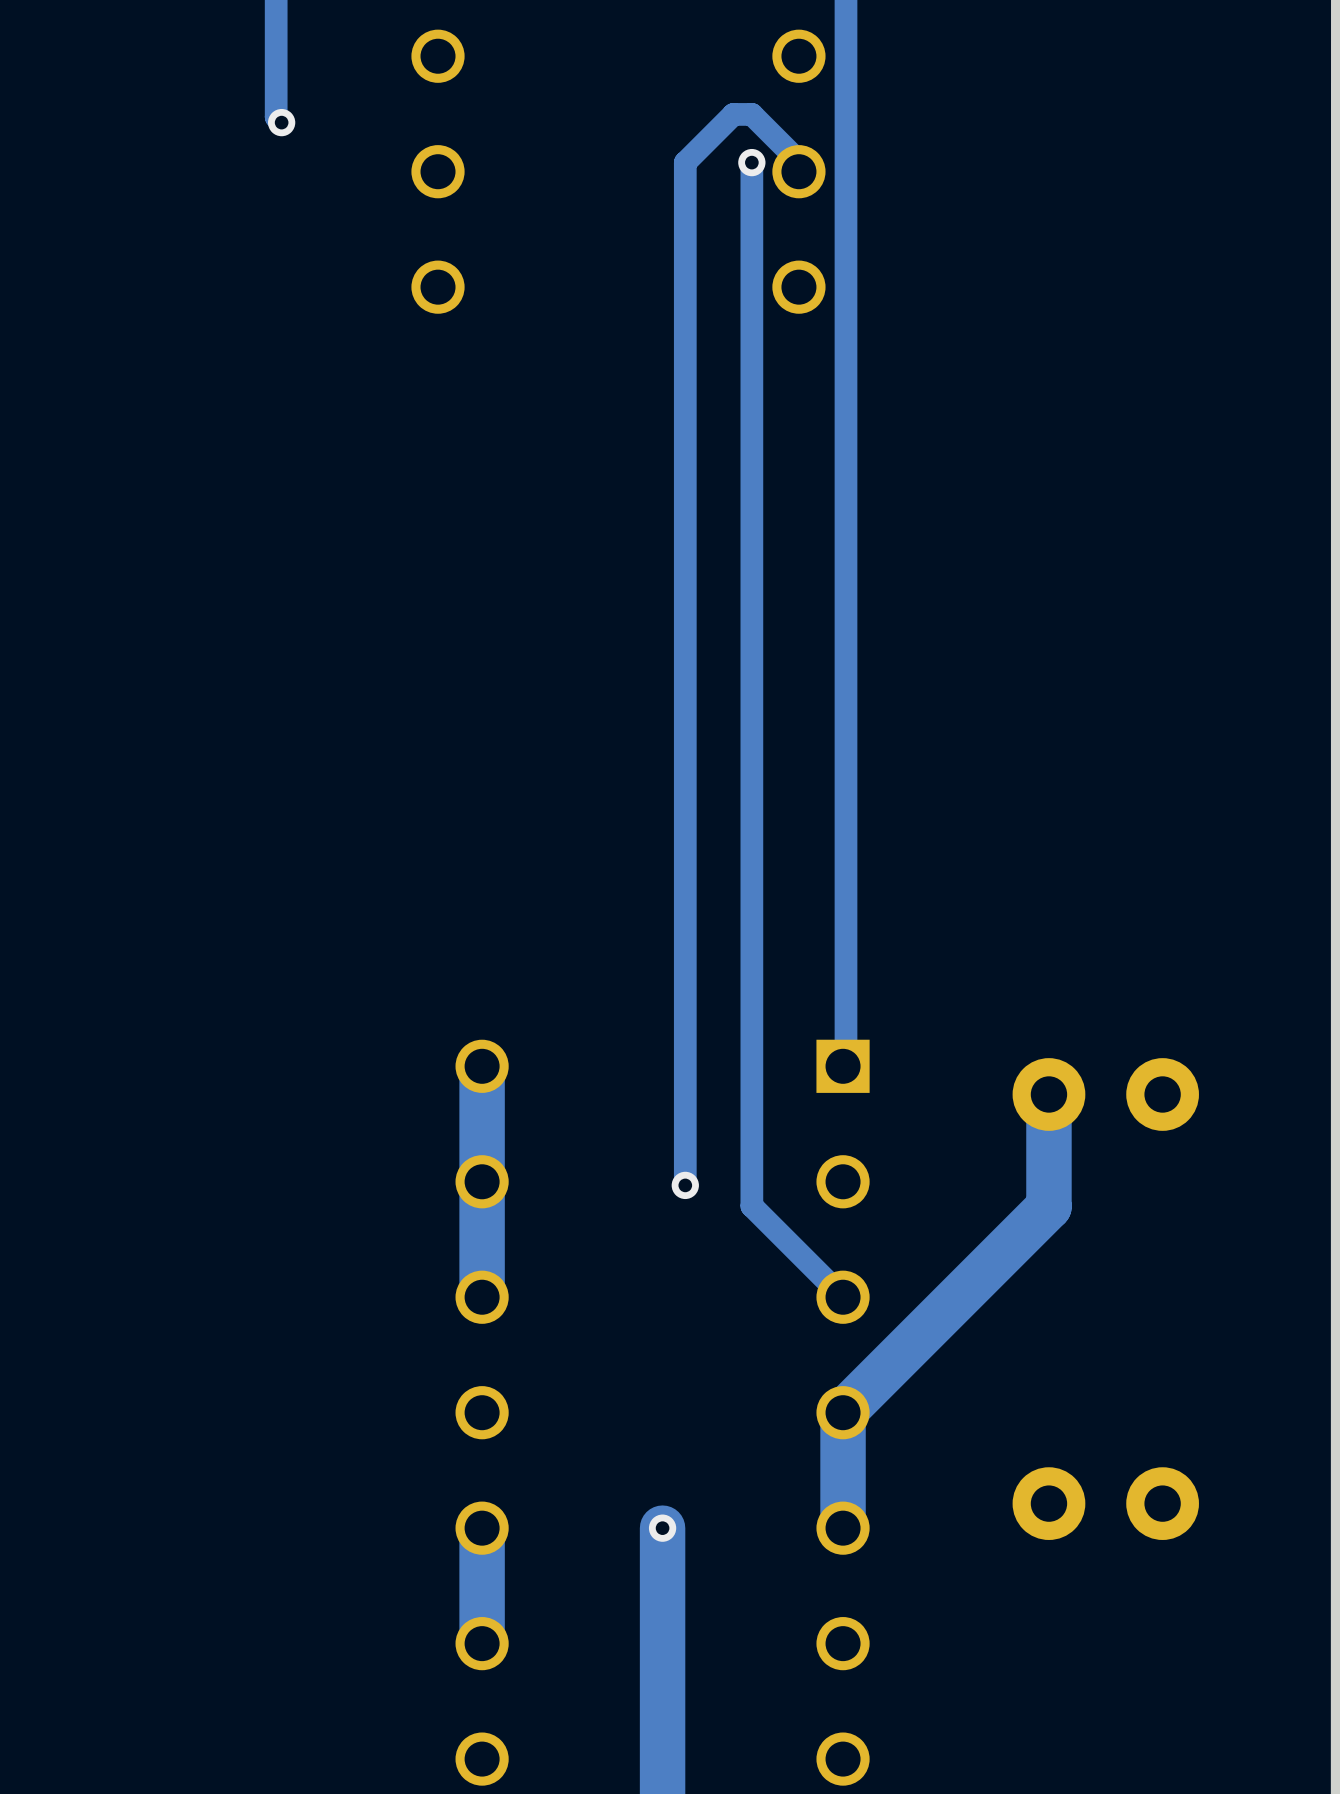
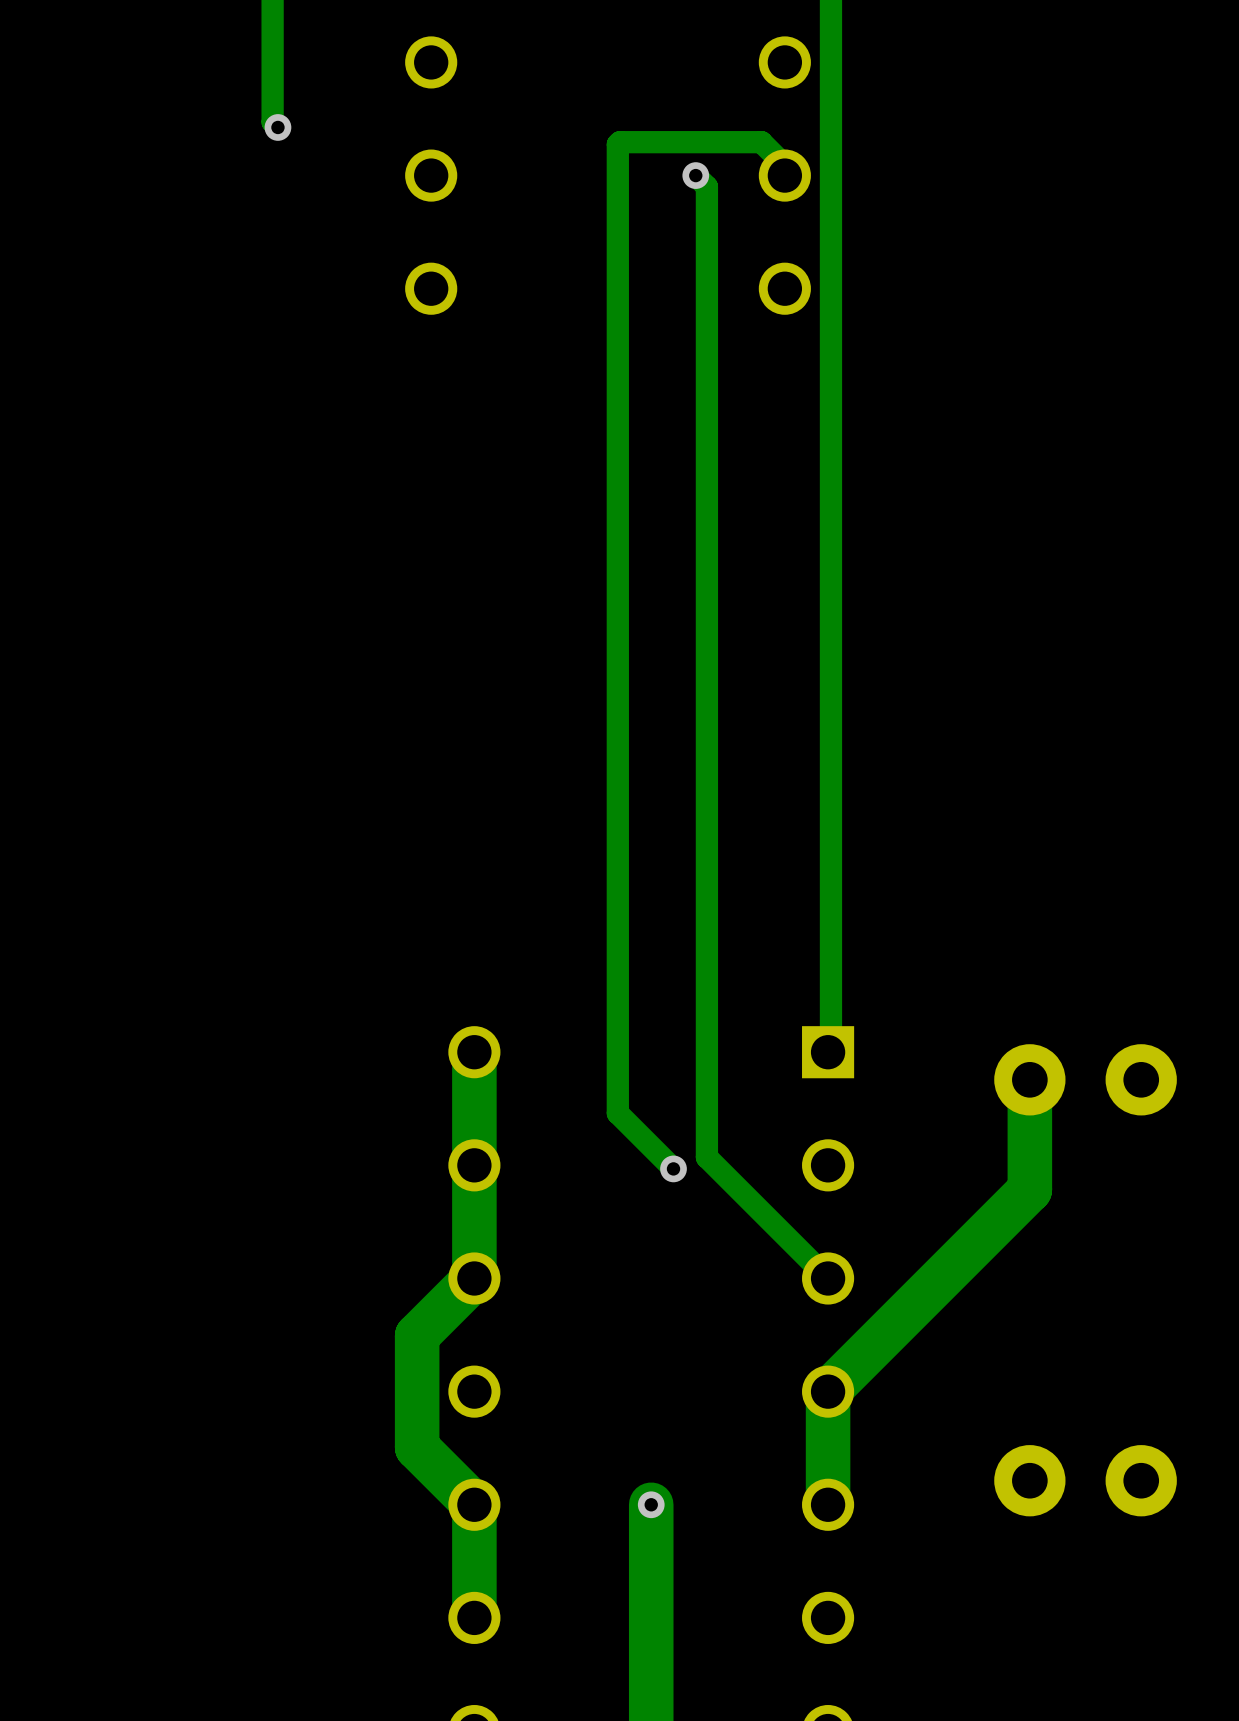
track: (775, 137) (751, 114) (733, 114) (685, 162) (685, 1185) -> (761, 142) (620, 142) (617, 144) (617, 1113) (673, 1168)
track: (751, 162) (751, 1206) -> (695, 175) (706, 186) (706, 1157) (738, 1189)
via position: (751, 162) -> (695, 175)
track: none -> (474, 1278) (417, 1335) (417, 1447) (474, 1504)

